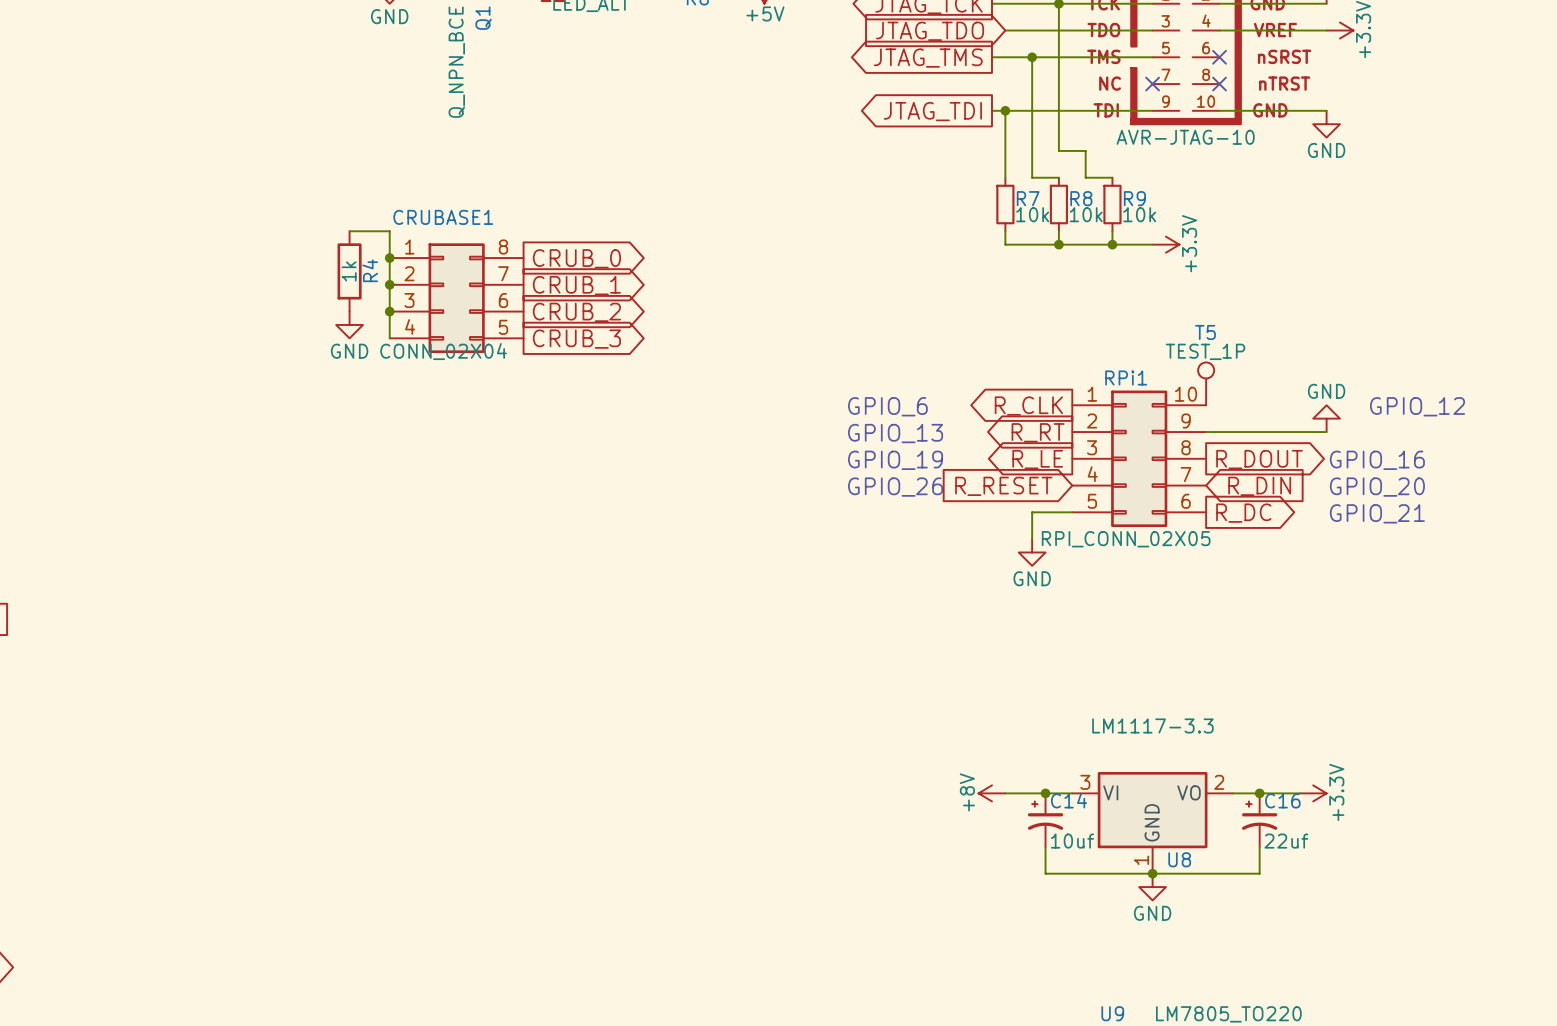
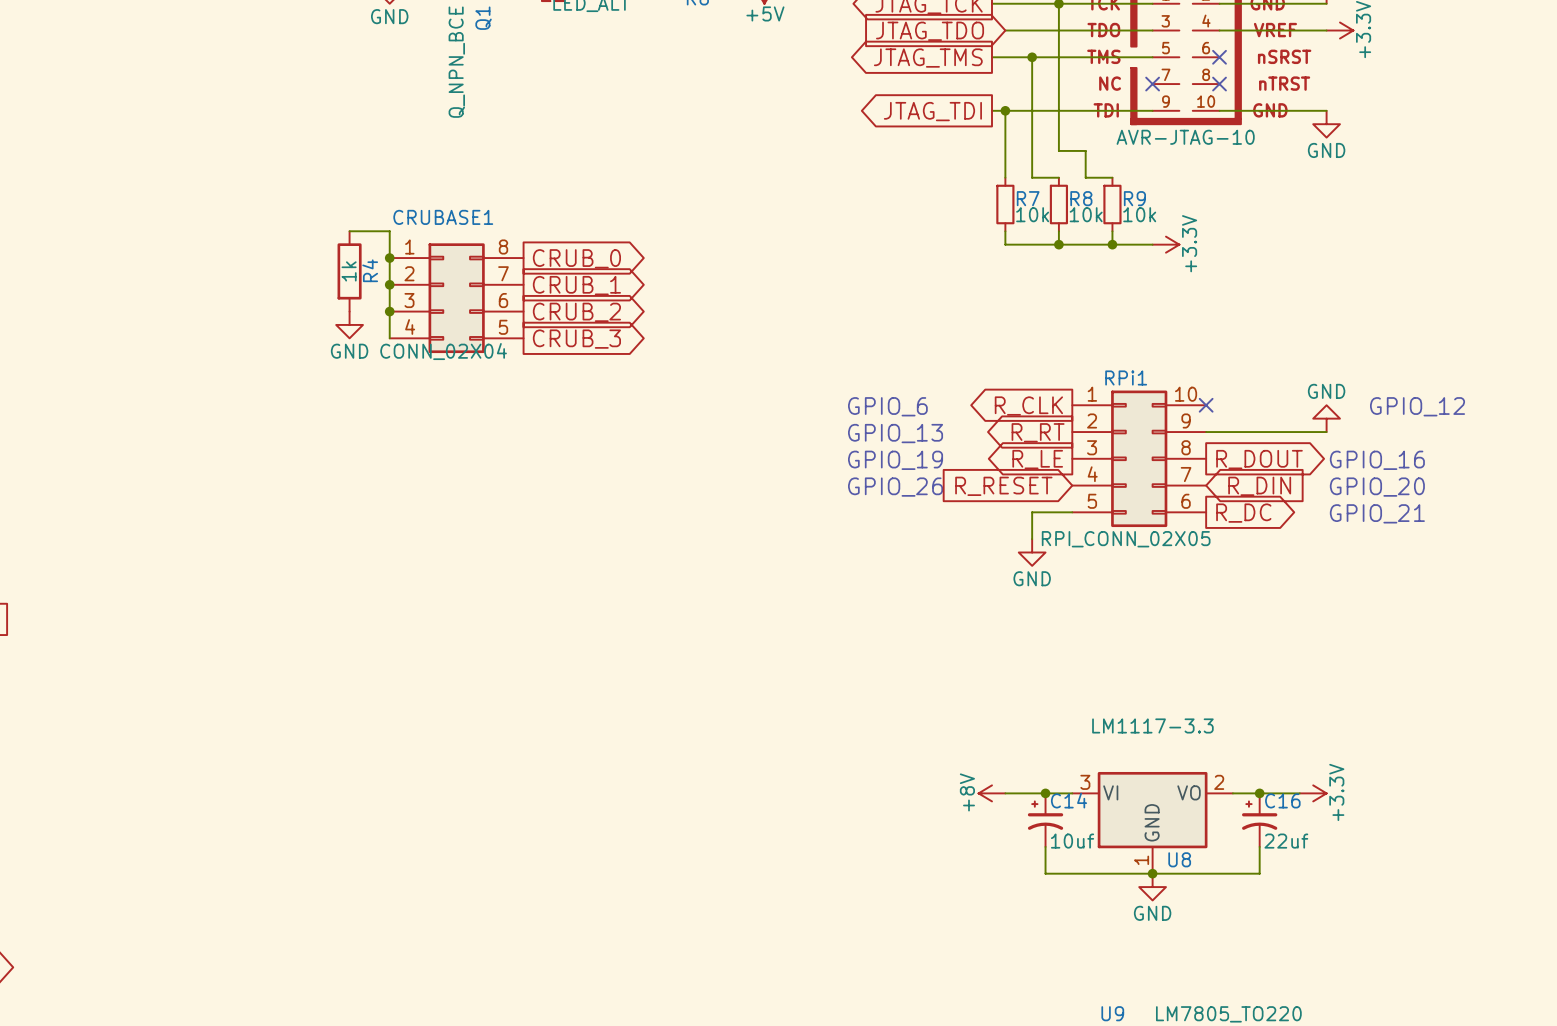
T5: TEST_1P (1206, 383) -> none
no-connect mark: none -> (1206, 405)

